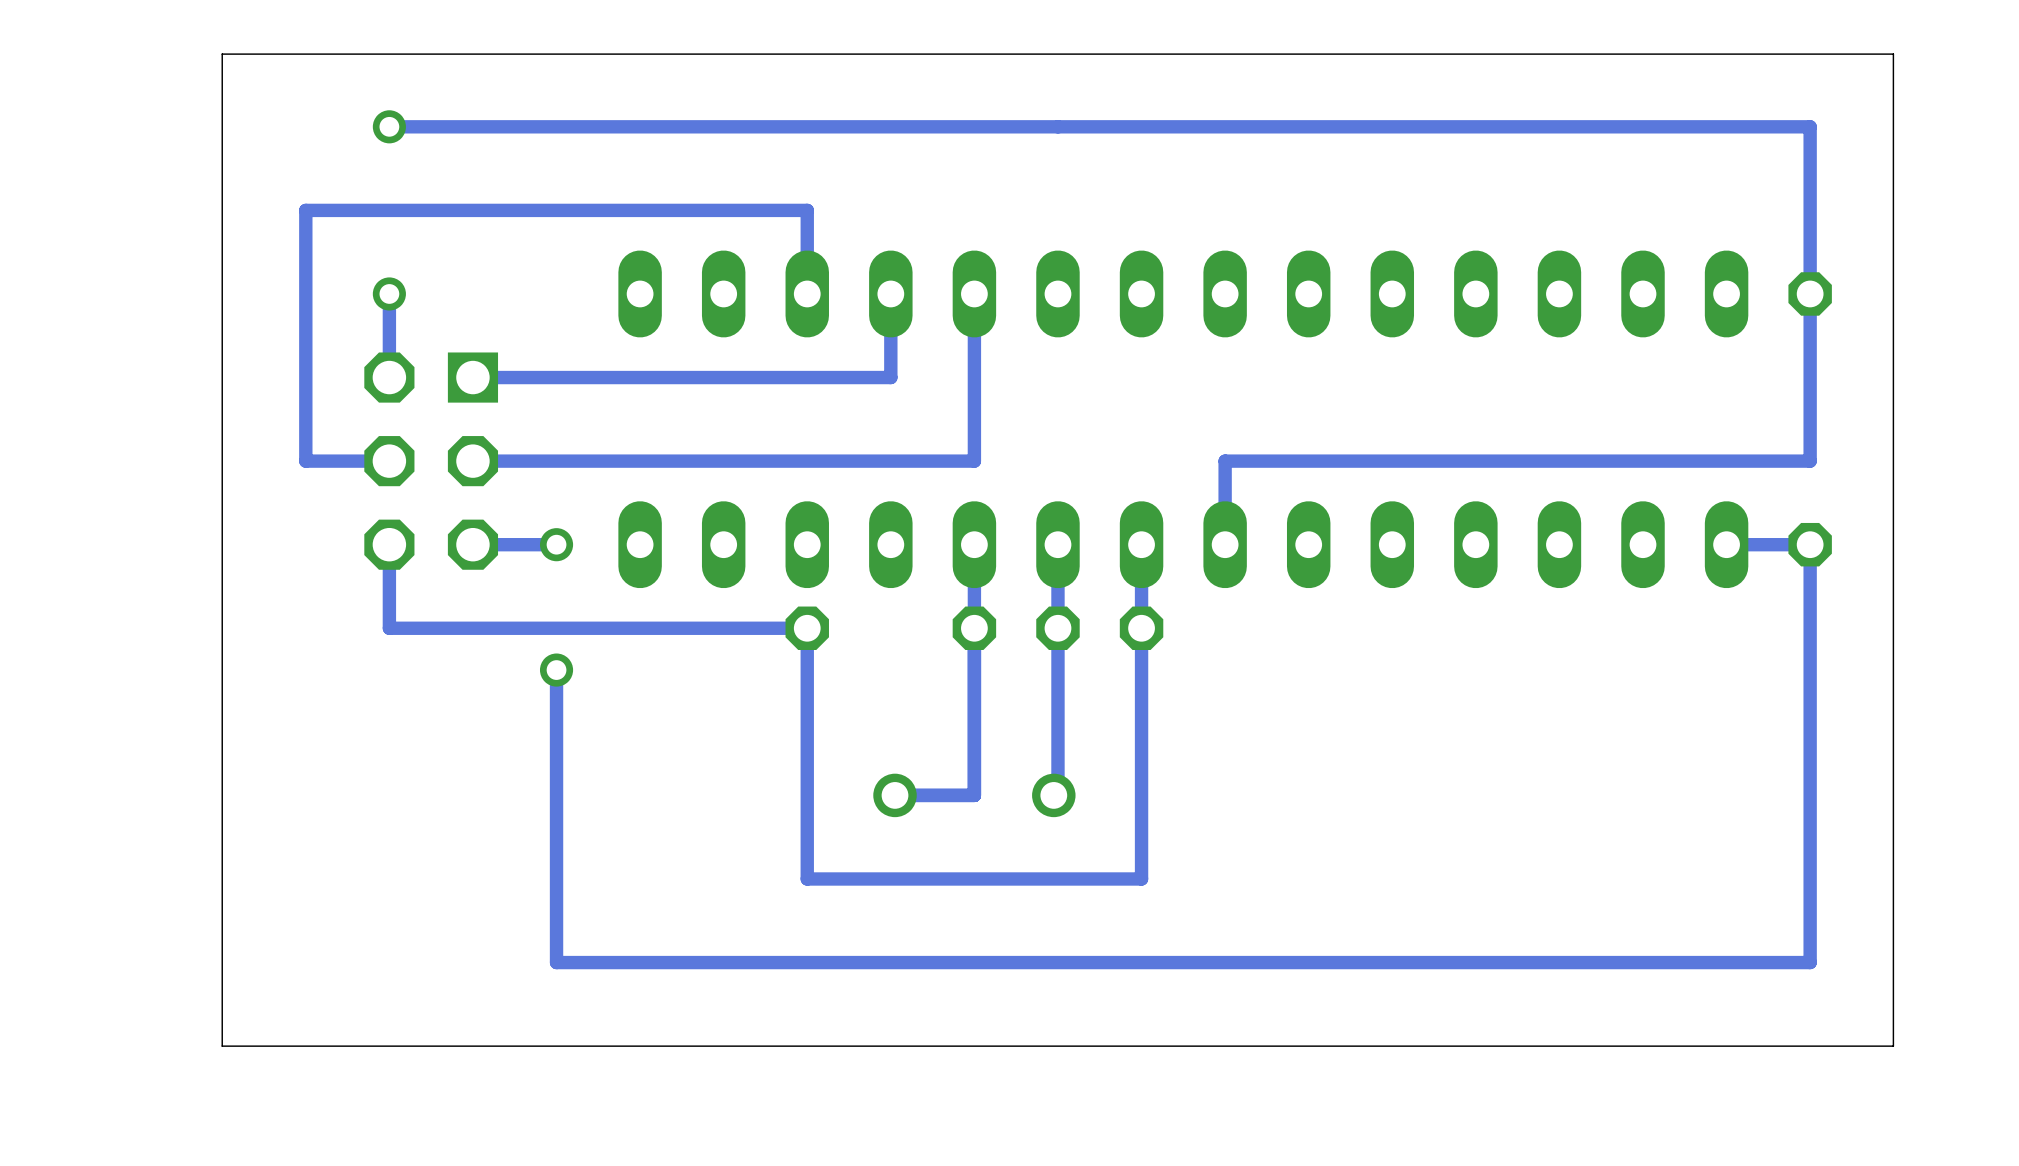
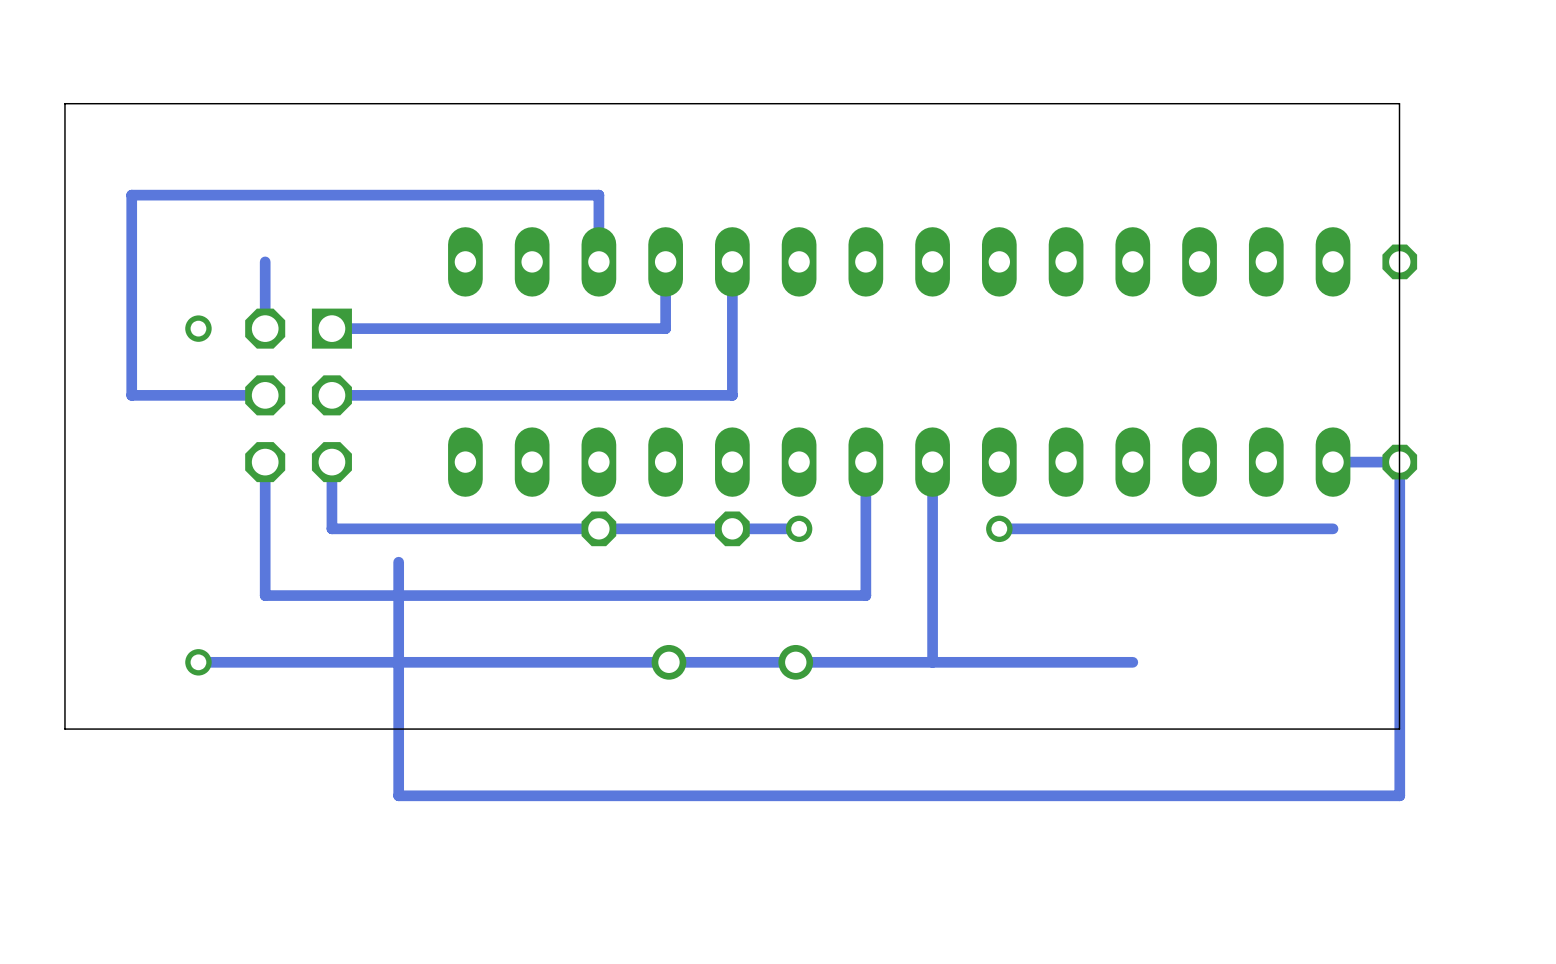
board edge: (1893, 54) (222, 54) (222, 1046) (1893, 1046) (1893, 54) -> (1399, 103) (1399, 729) (64, 729) (64, 103) (1399, 103)
track: (389, 126) (1810, 126) (1810, 461) (1225, 461) (1225, 544) -> (932, 662) (932, 462)
via: (389, 126) -> none
track: (305, 210) (305, 461) -> (198, 195) (131, 195) (131, 395) (198, 395)
via position: (389, 293) -> (198, 328)
track: (556, 544) (472, 544) -> (331, 528) (331, 462)
via: (556, 544) -> none
track: (974, 544) (974, 795) -> (795, 662) (732, 662)
track: (1057, 544) (1057, 795) -> (1132, 662) (799, 662)
track: (472, 628) (389, 628) -> (865, 595) (265, 595) (265, 528)
track: (807, 628) (807, 878) (1141, 878) (1141, 711) -> (598, 528) (799, 528)
via: none -> (799, 528)
part: (1099, 628) -> none
via: none -> (999, 528)
track: none -> (1333, 528) (999, 528)
via: (556, 670) -> none
via: none -> (198, 662)
track: none -> (668, 662) (198, 662)

